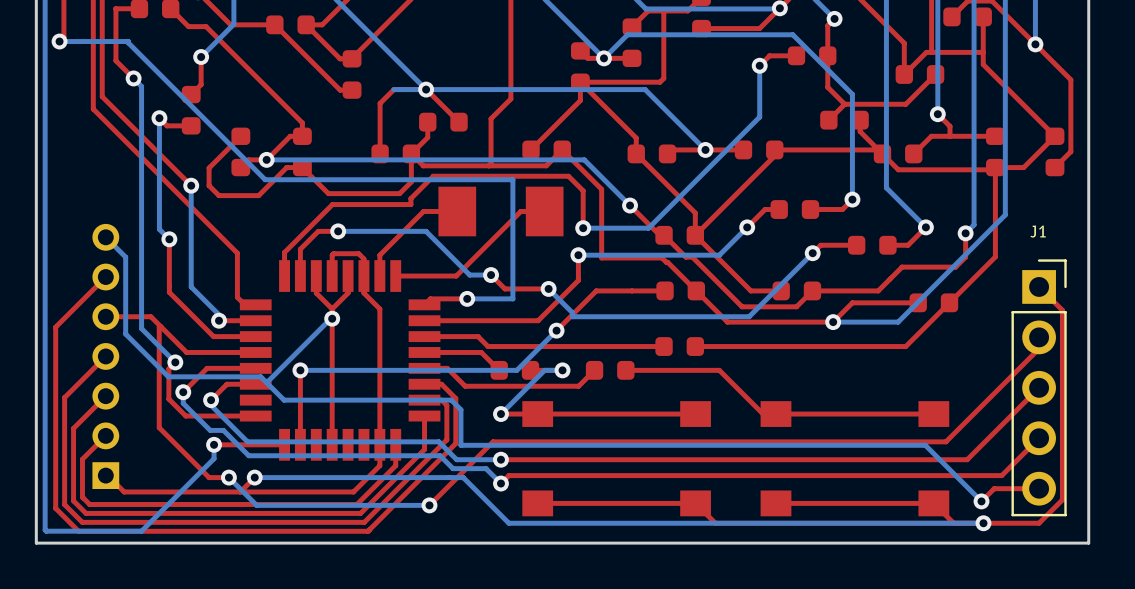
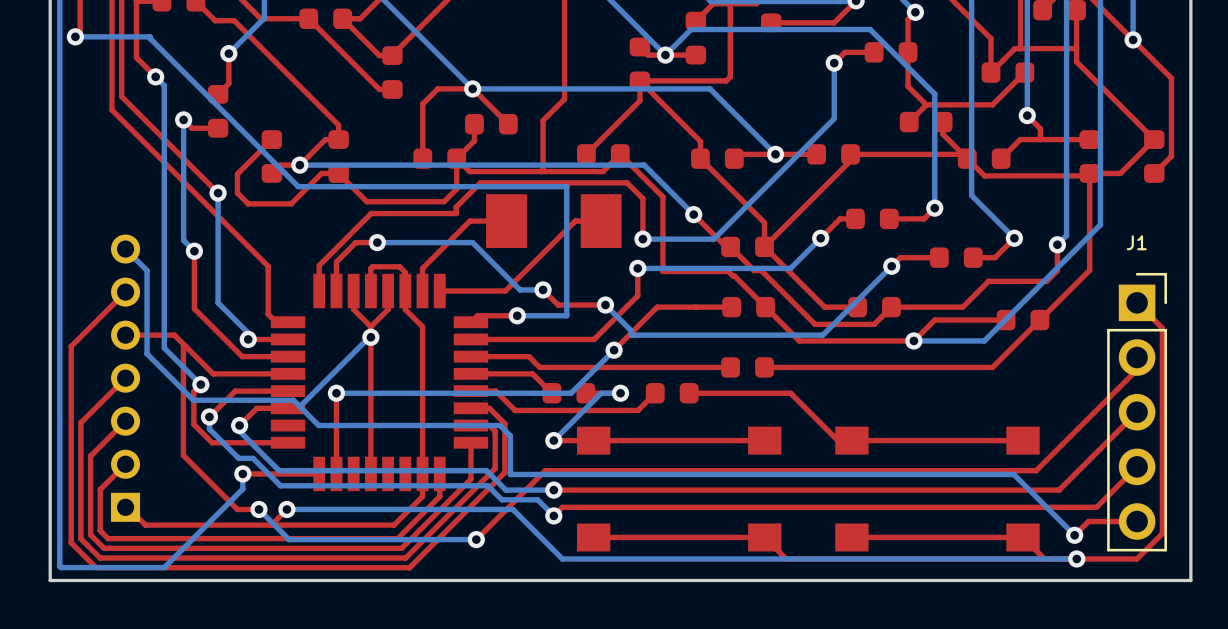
bottom track: (426, 89) (393, 89) -> none

